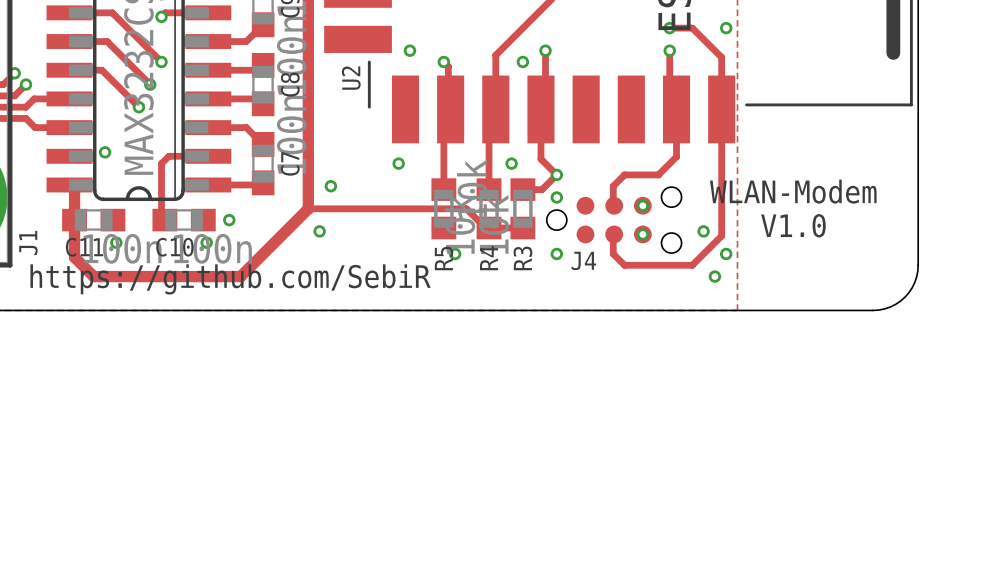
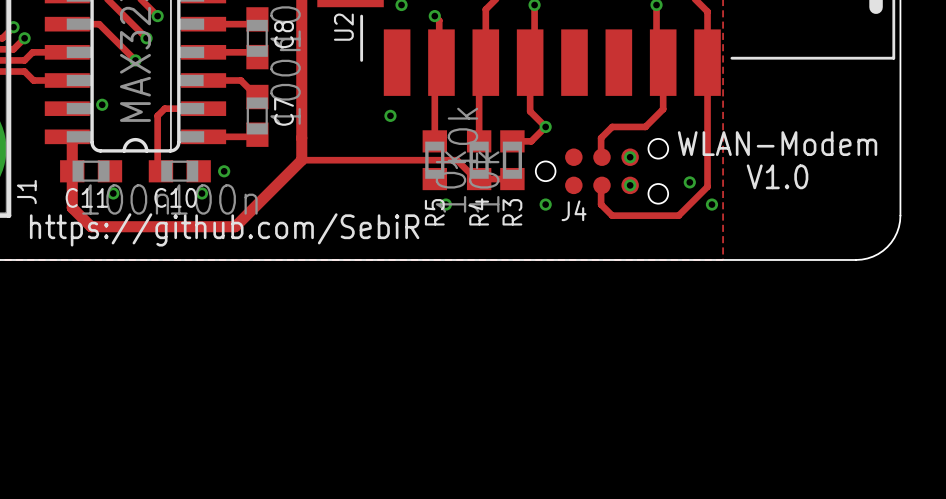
via: (522, 61) -> none
via: (511, 163) -> none
via: (330, 186) -> none
via: (556, 197) -> none
via: (319, 231) -> none
via: (714, 276) -> none

